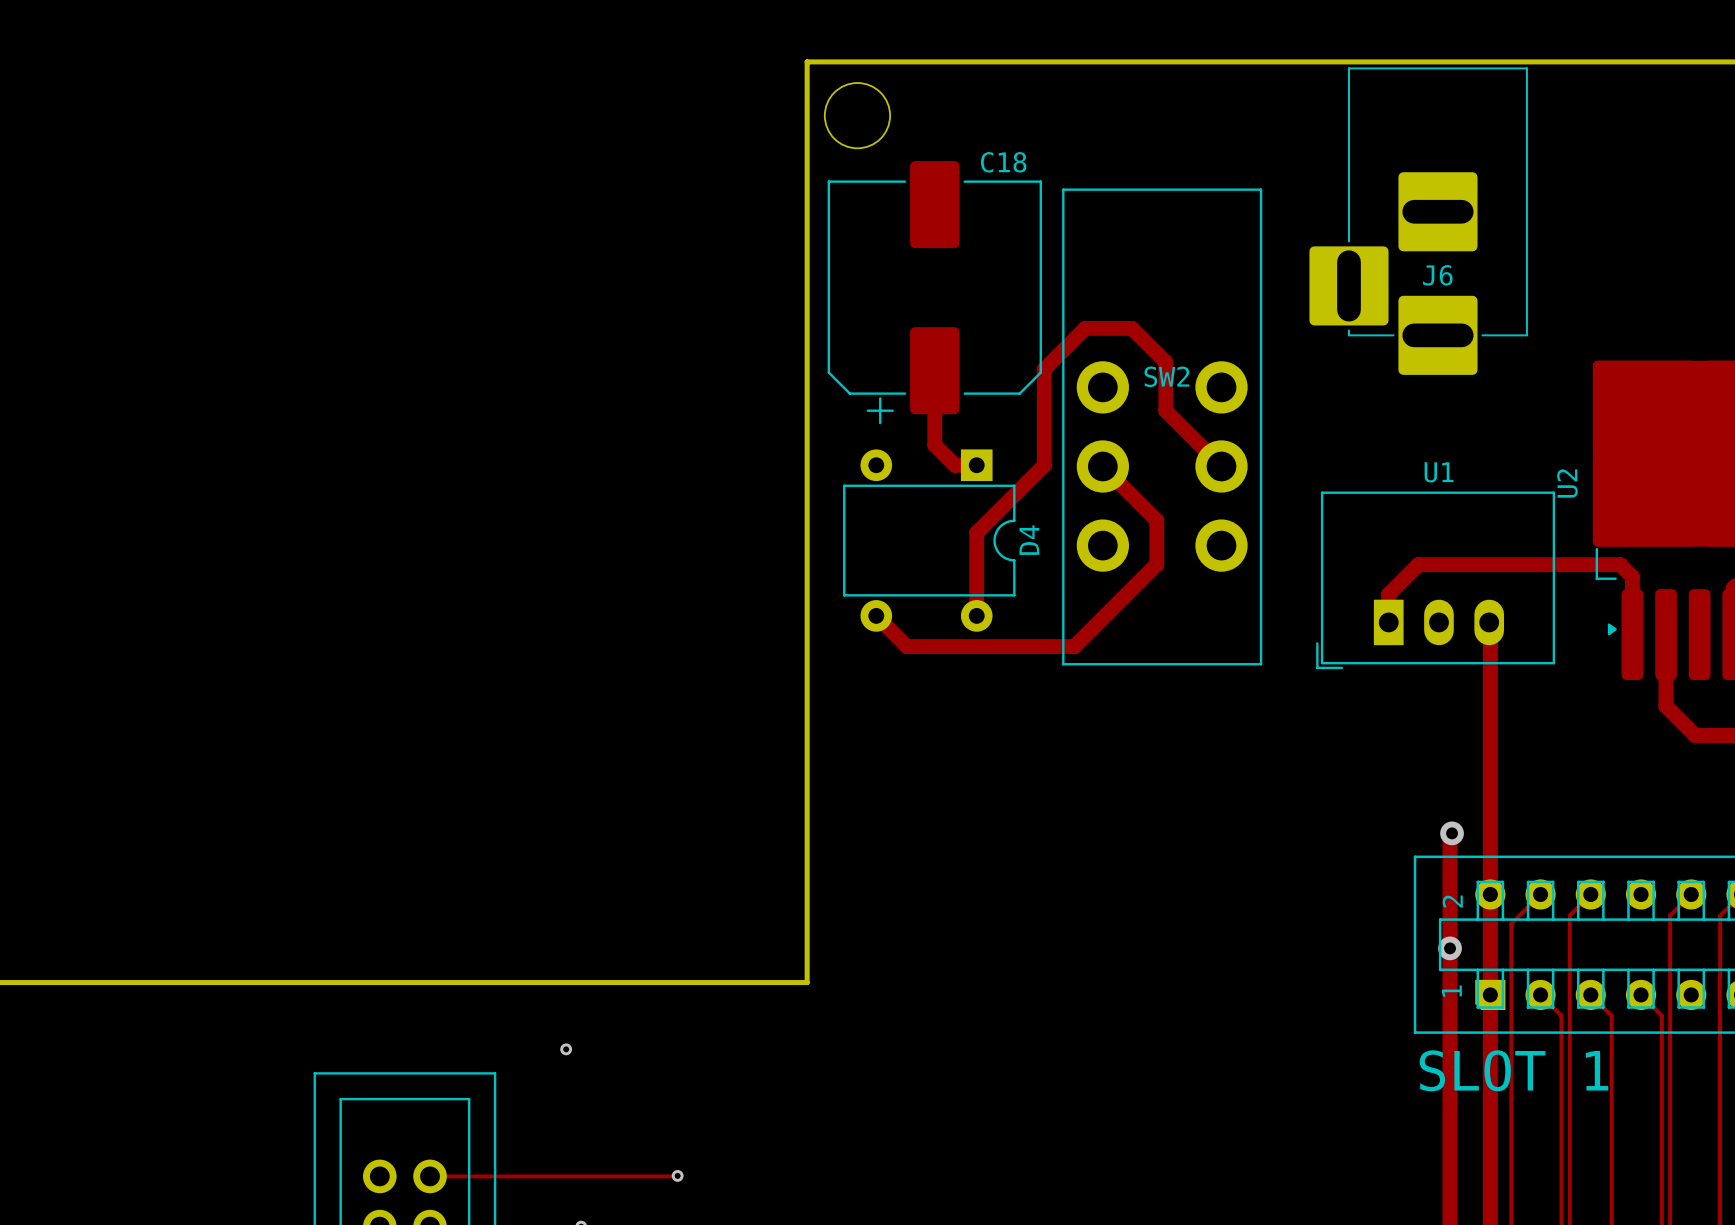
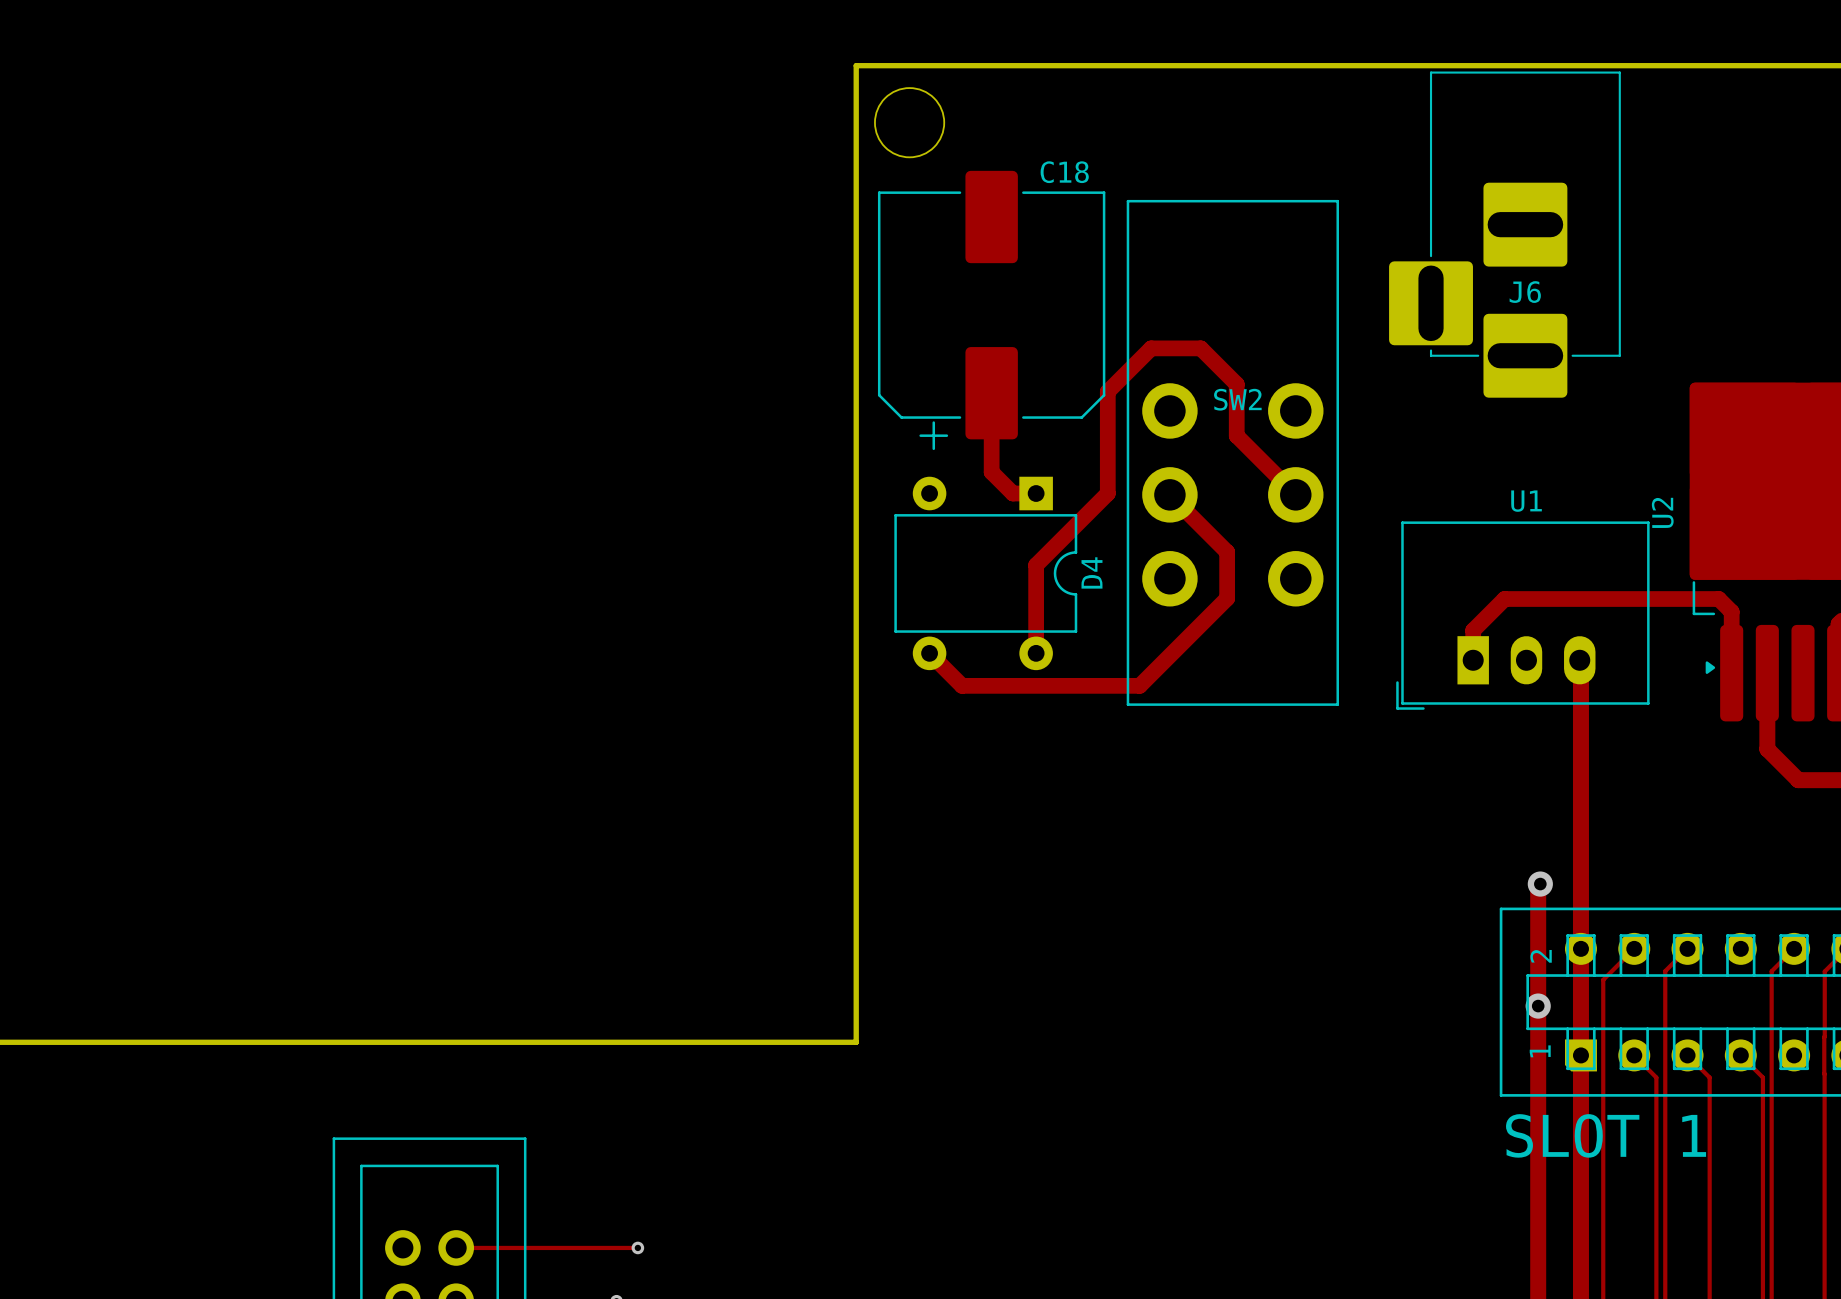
via: (566, 1049) -> none
track: (677, 1175) (601, 1176) -> none
via: (677, 1175) -> none
via: none -> (637, 1247)

